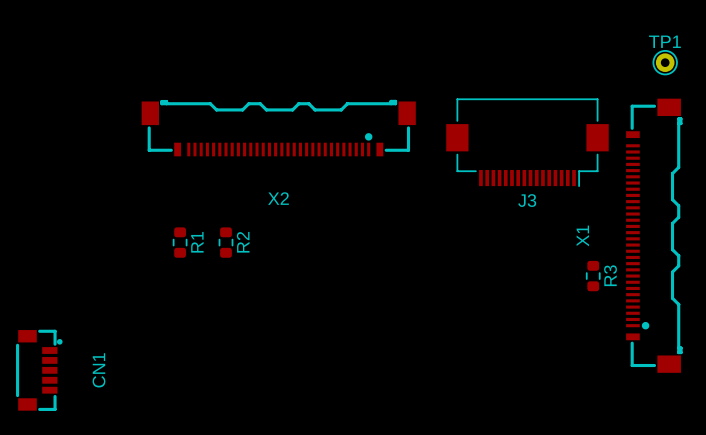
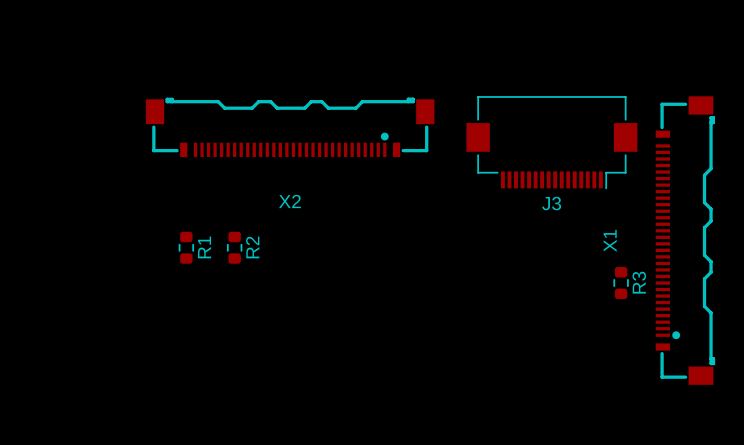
TP1: (665, 62) -> none
CN1: (39, 370) -> none

